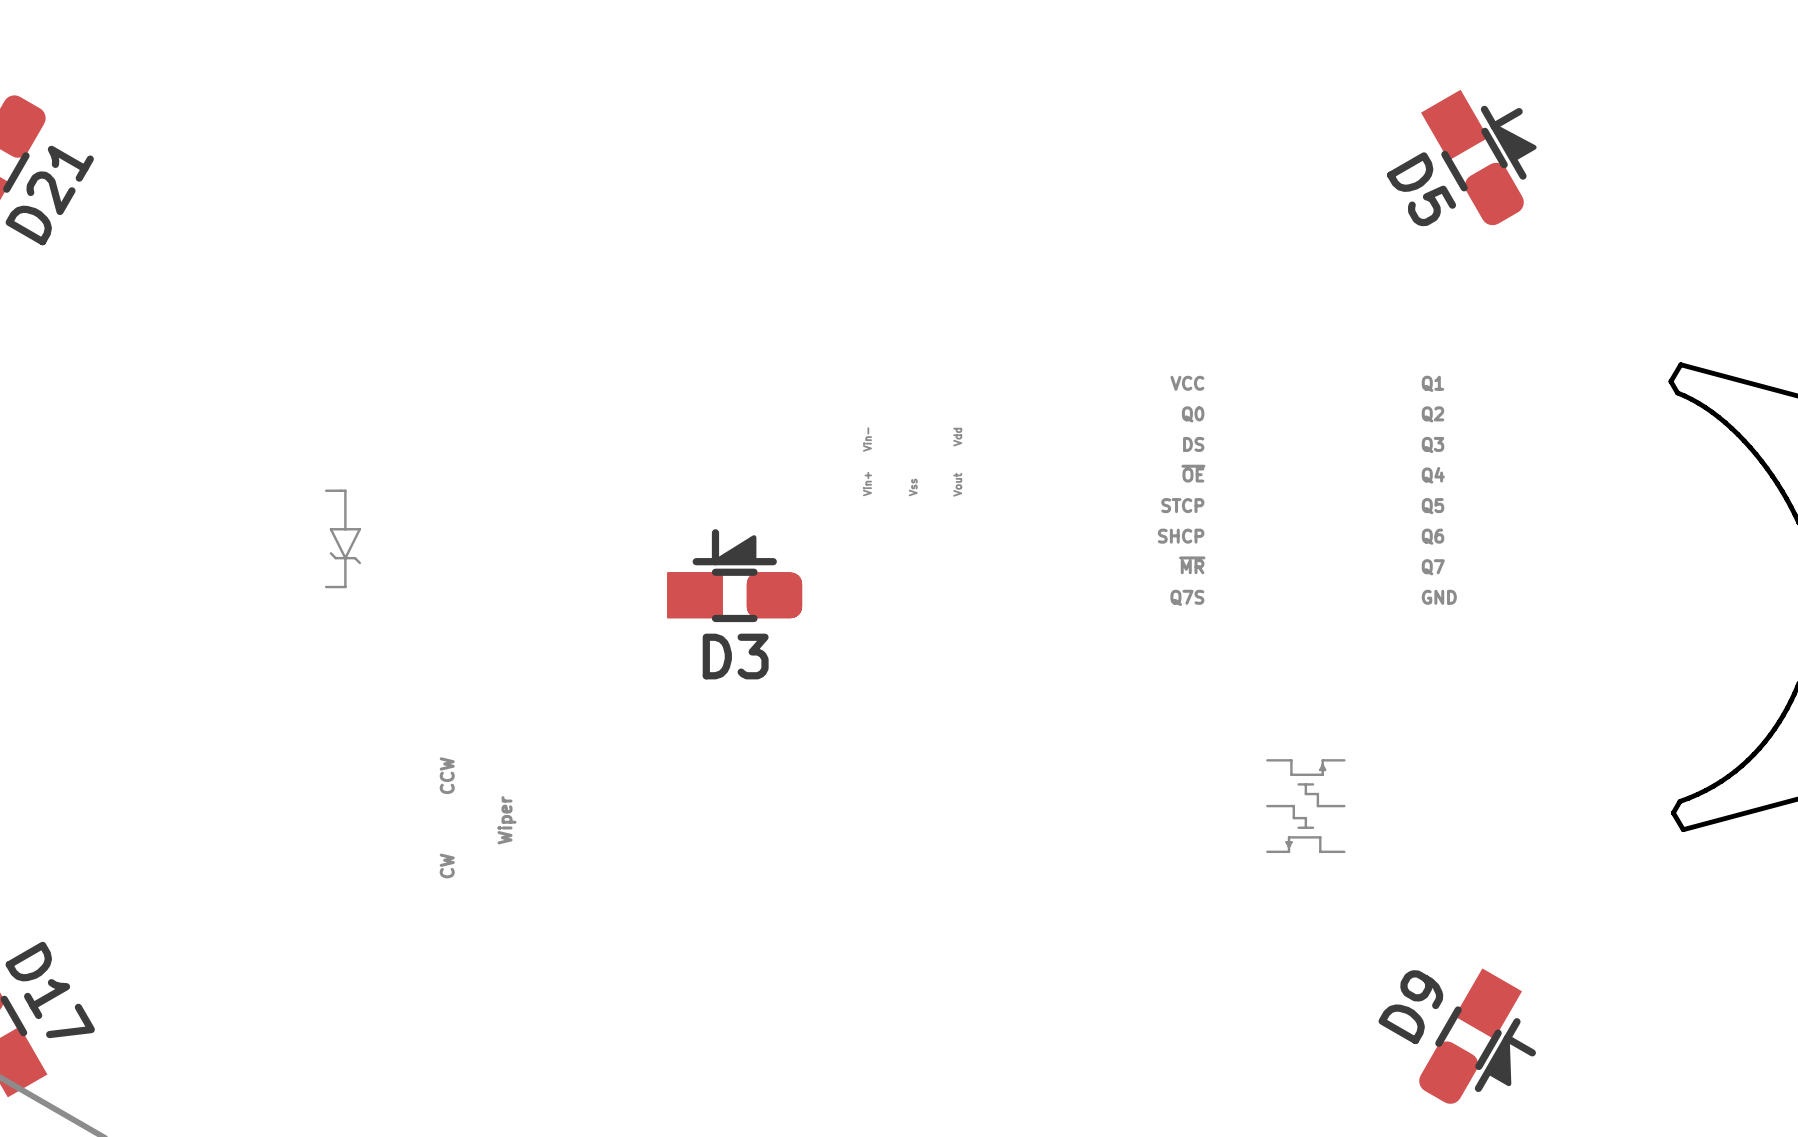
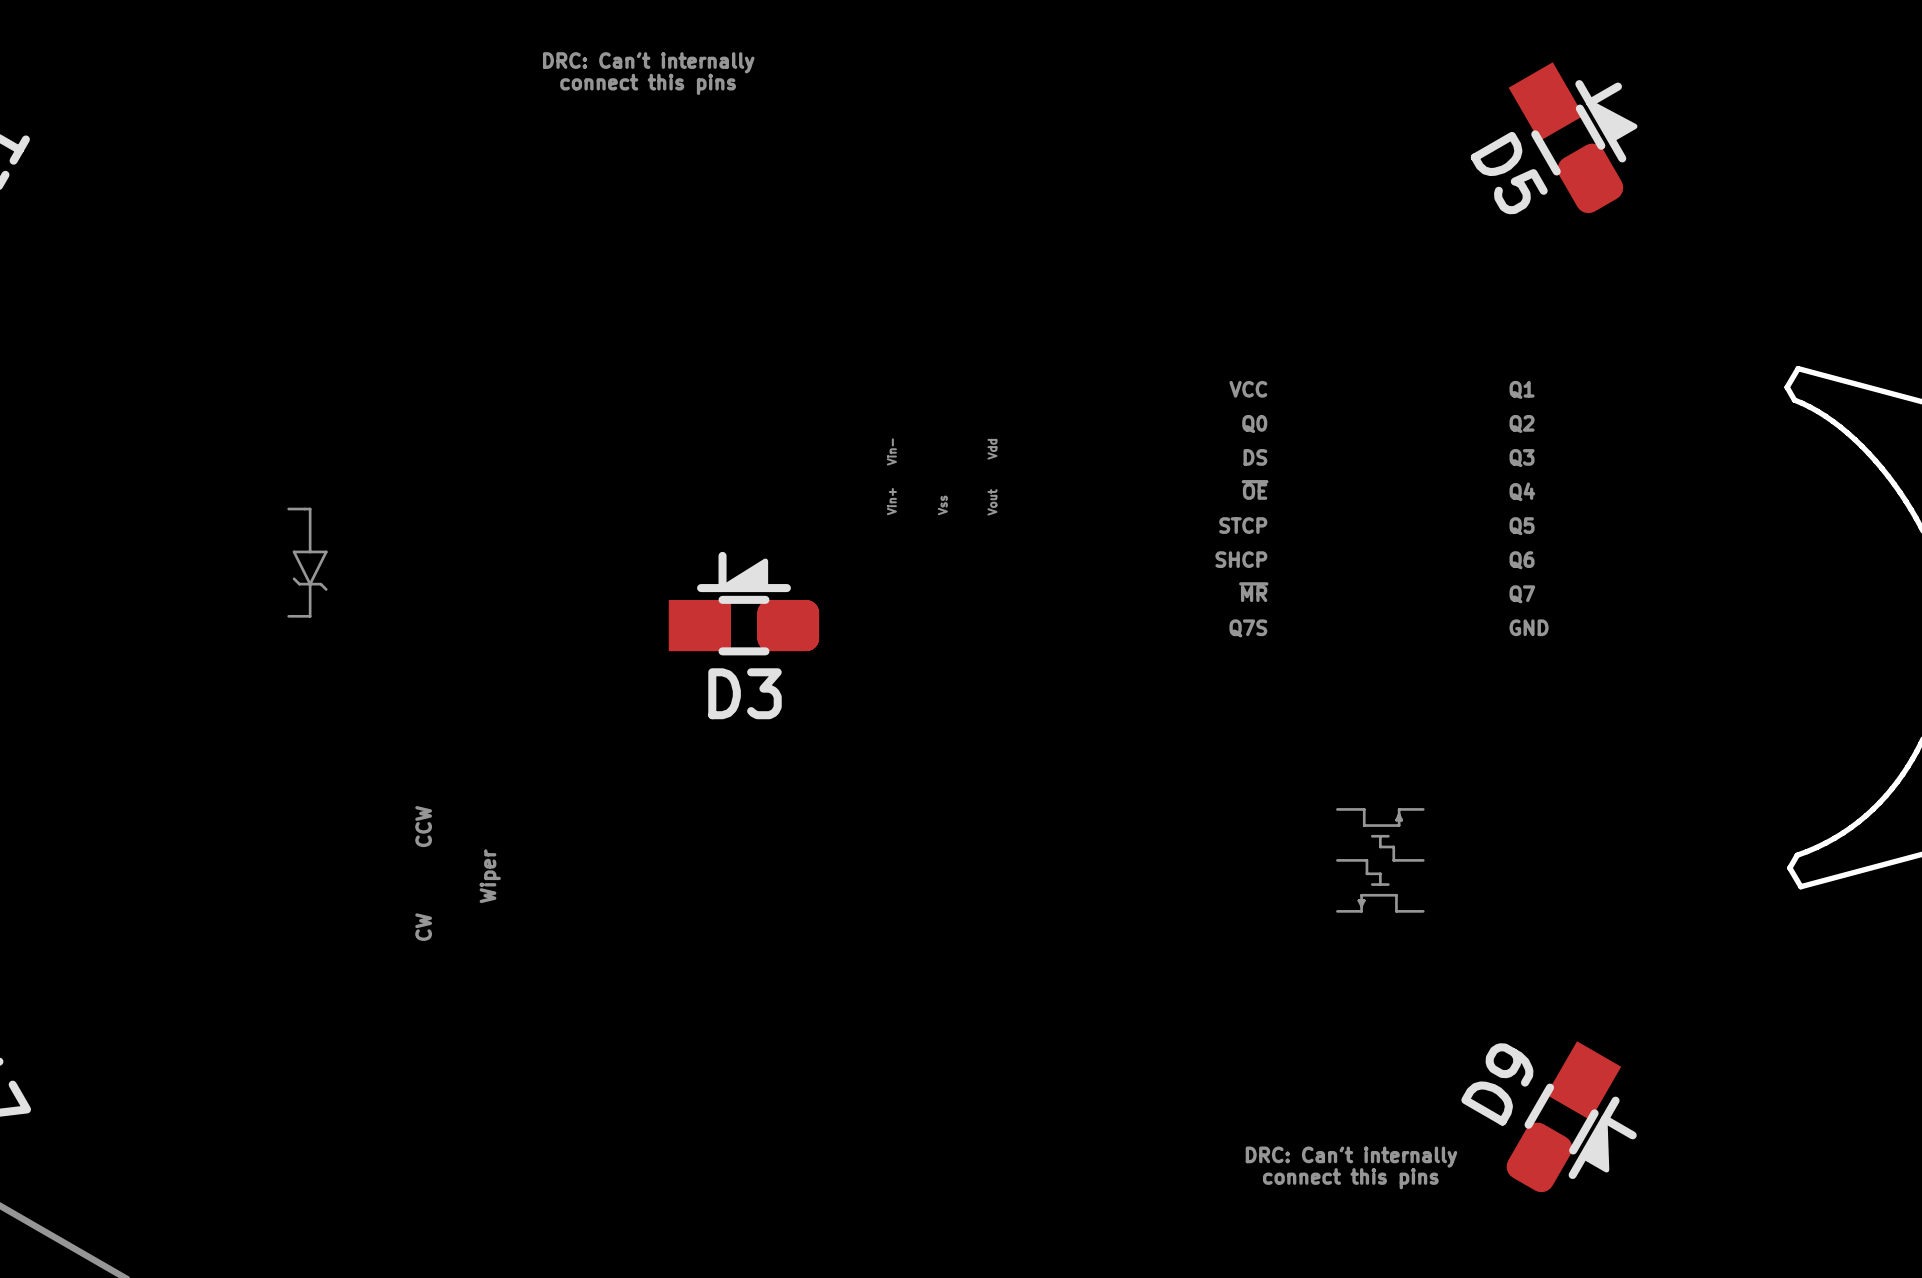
text: none -> DRC: Can't internally (648, 62)
text: none -> connect this pins (648, 84)
text: none -> DRC: Can't internally (1351, 1157)
text: none -> connect this pins (1350, 1178)

